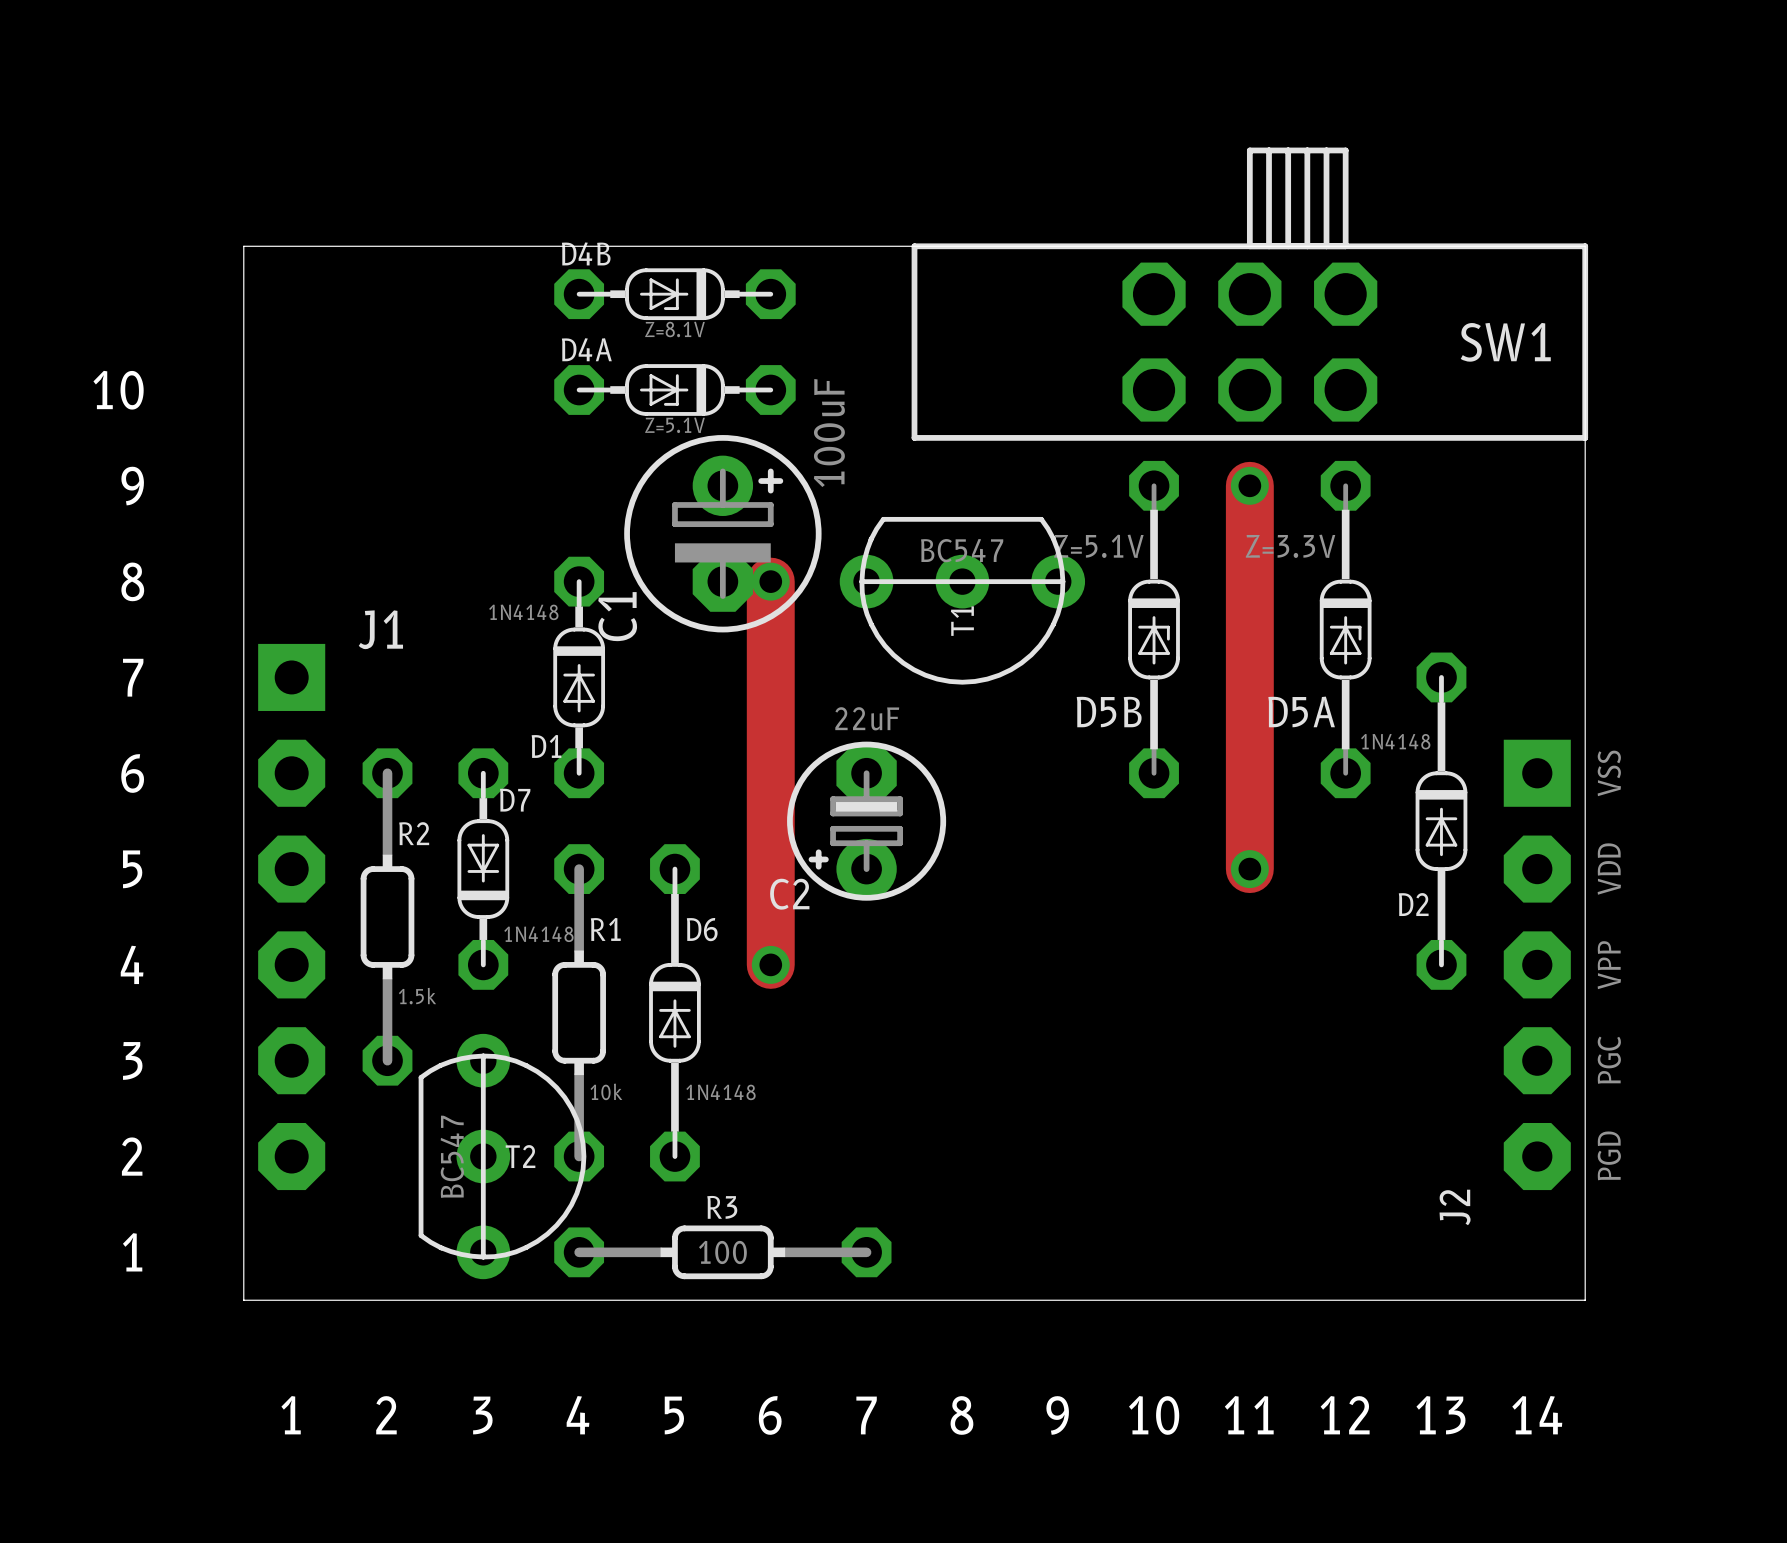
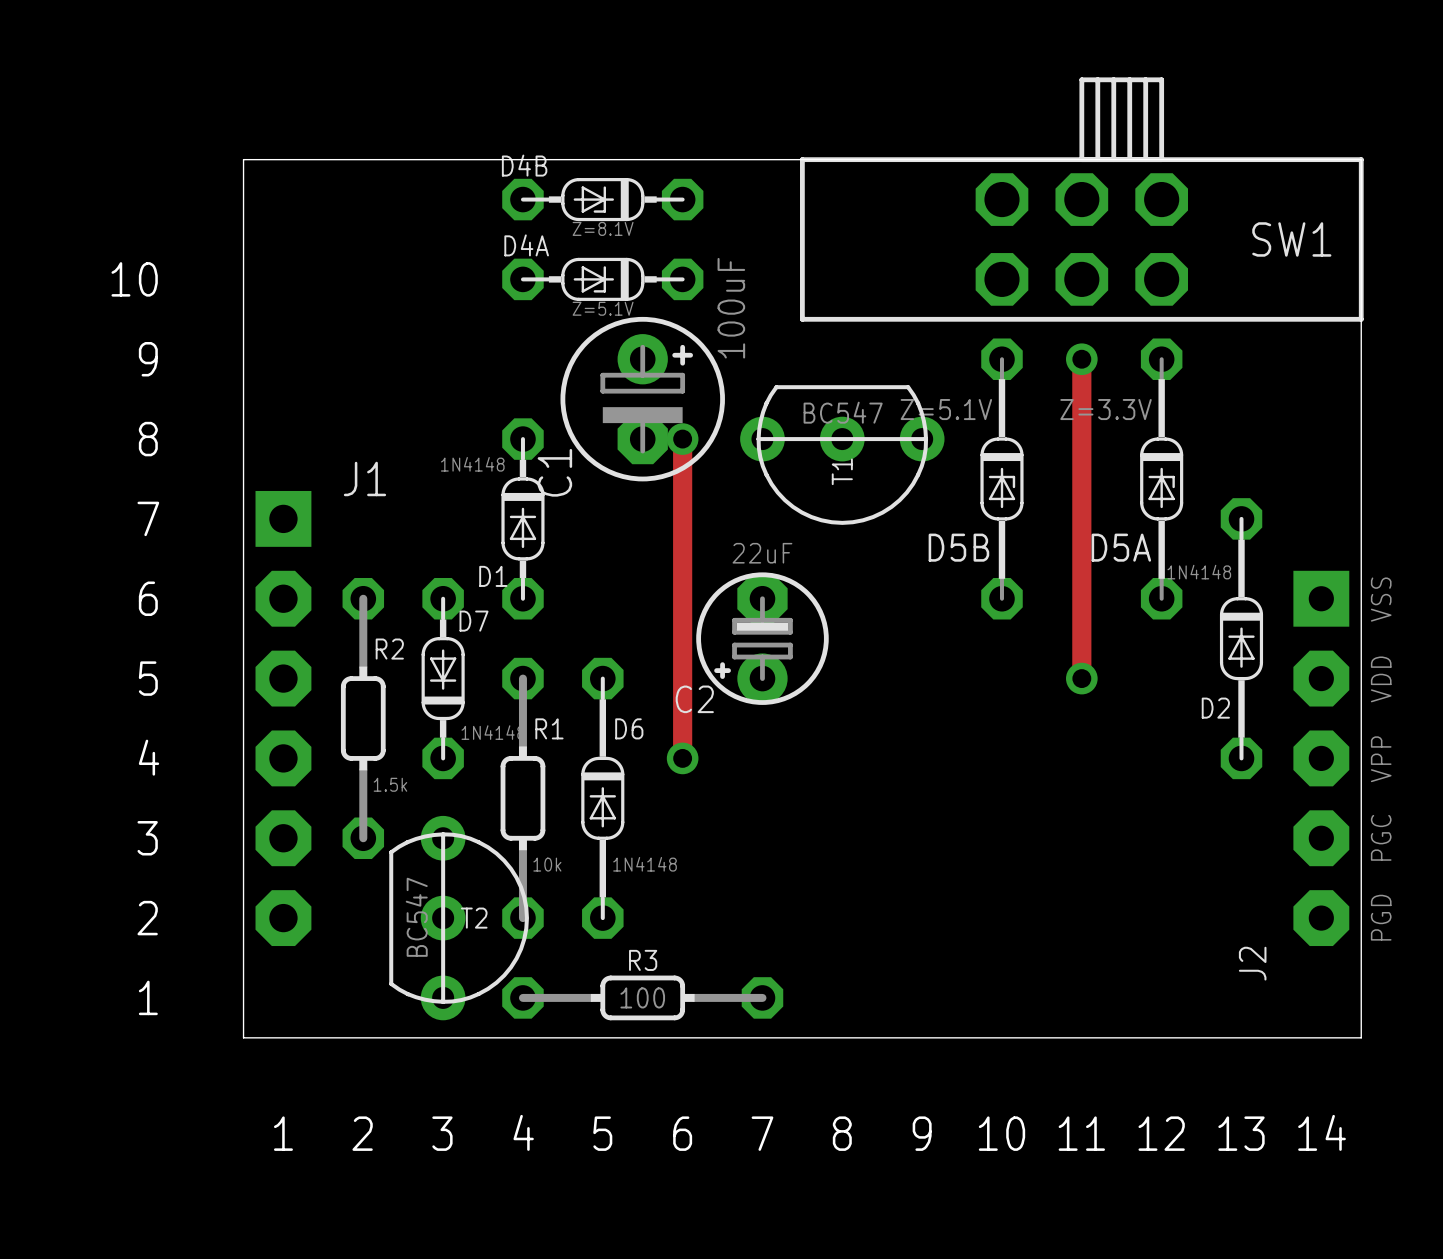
track width: thick (1249, 485) (1249, 869) -> thin (1081, 359) (1081, 678)
track width: thick (770, 581) (770, 964) -> thin (682, 439) (682, 758)

